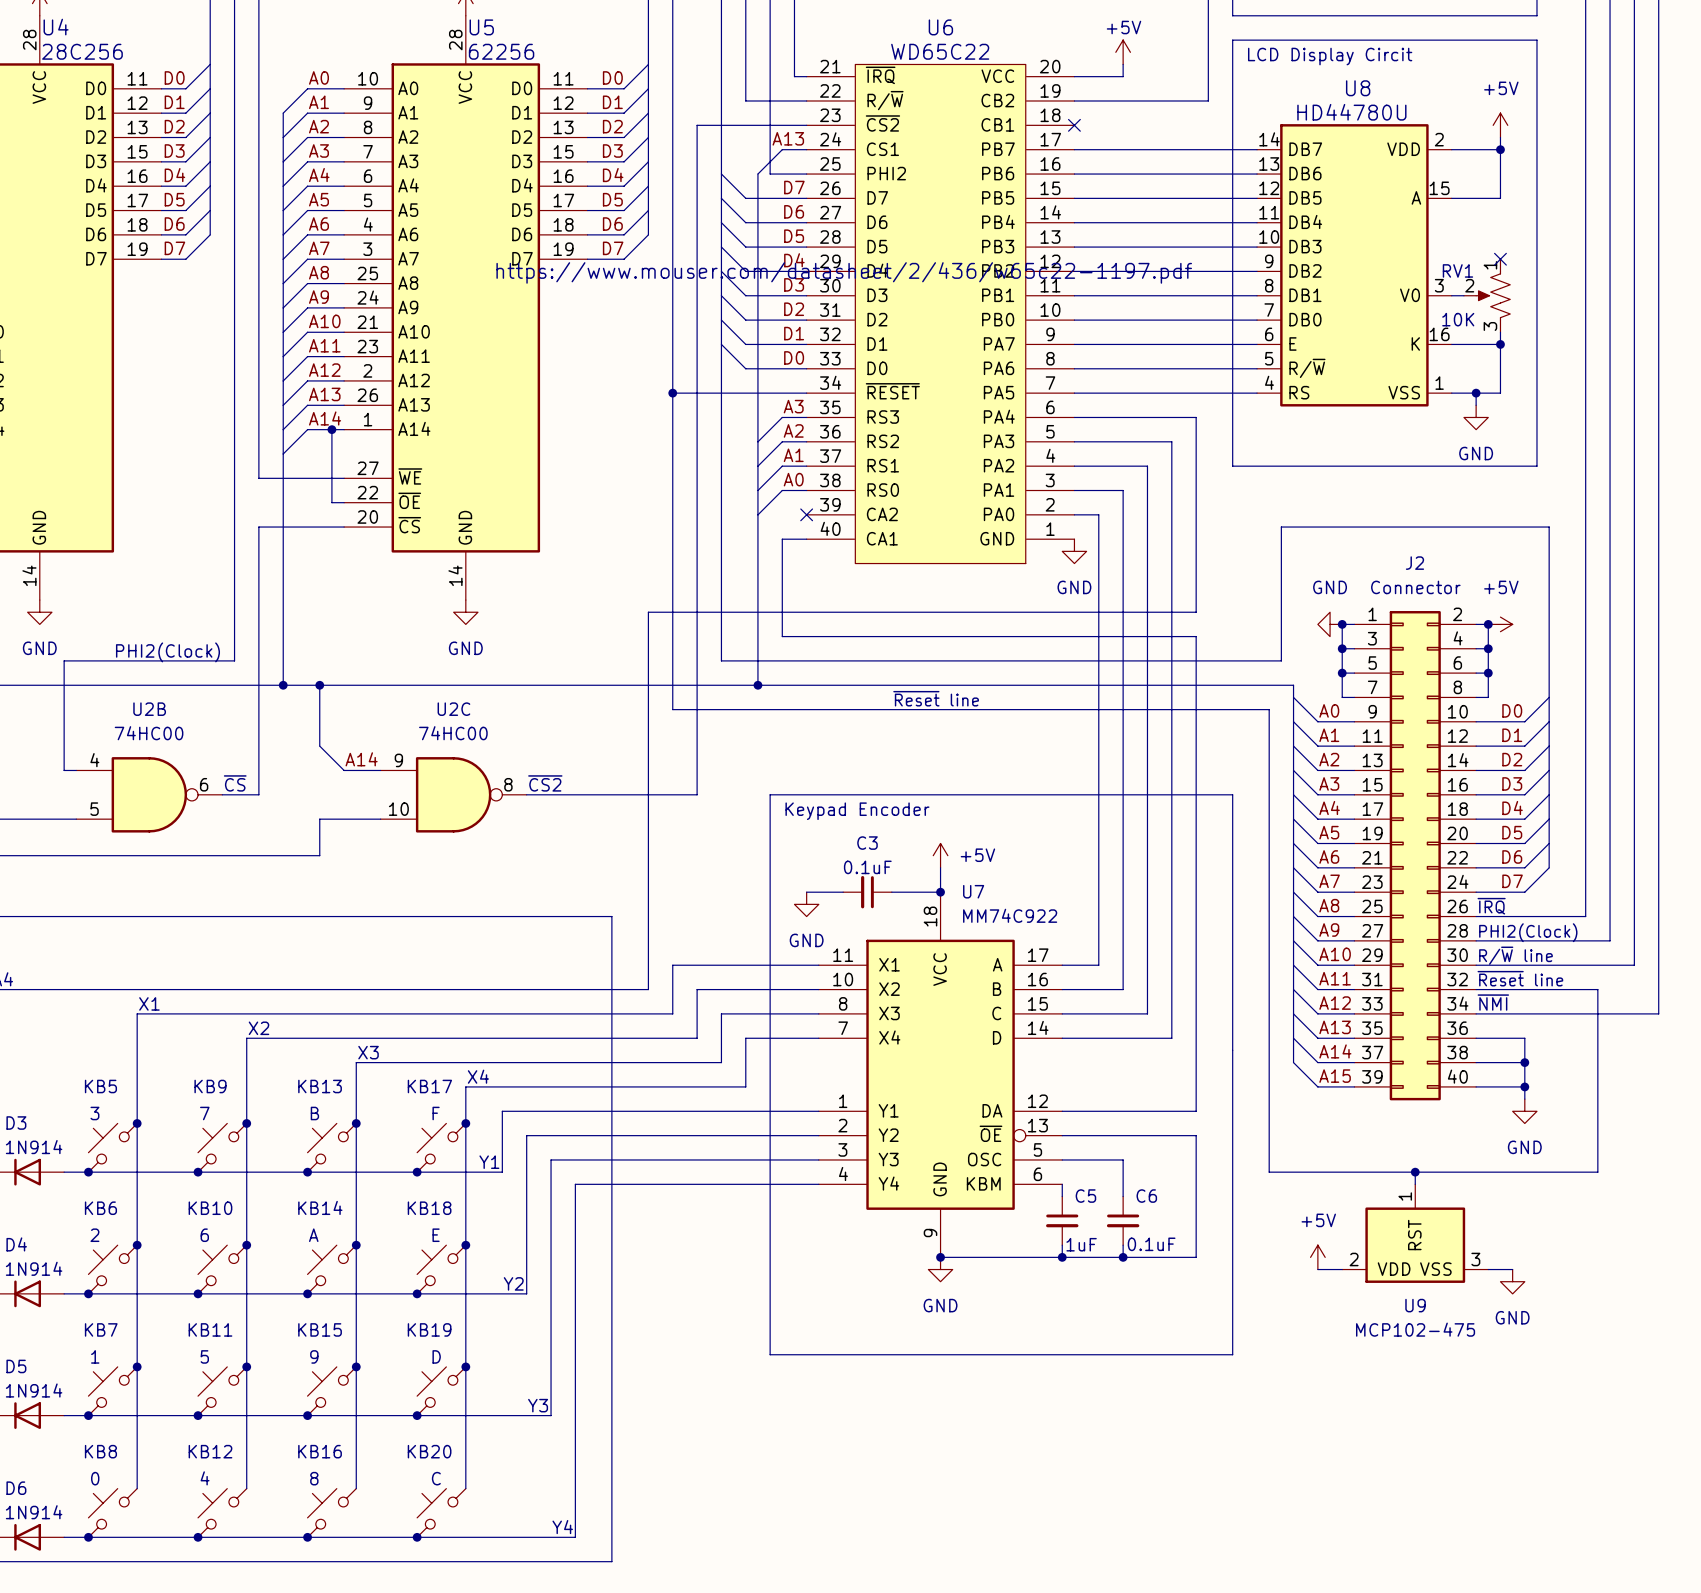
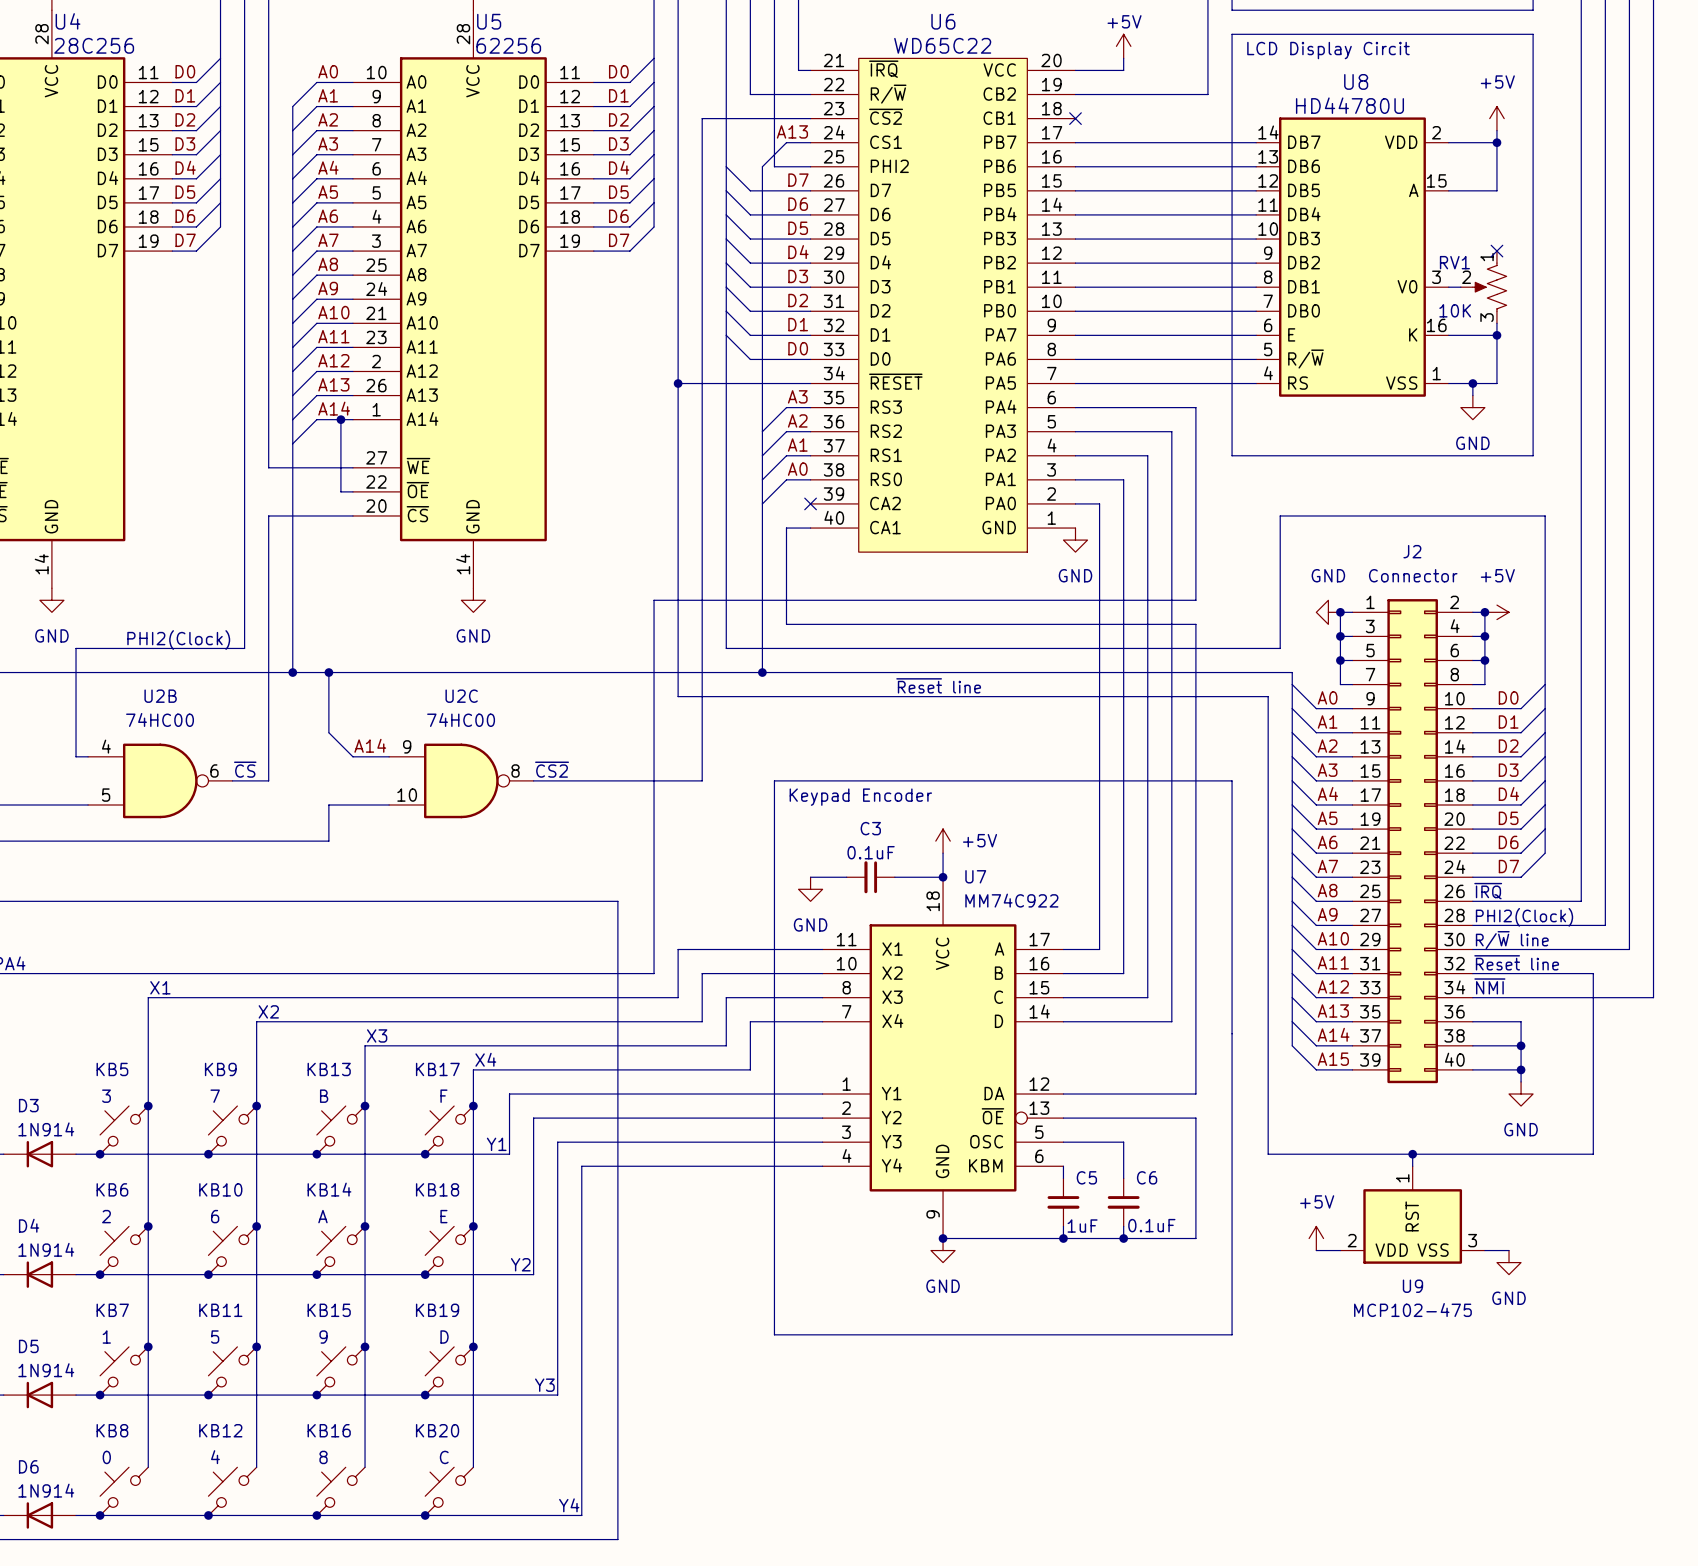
U6 text: https://www.mouser.com/datasheet/2/436/w65c22-1197.pdf (844, 272) -> none

